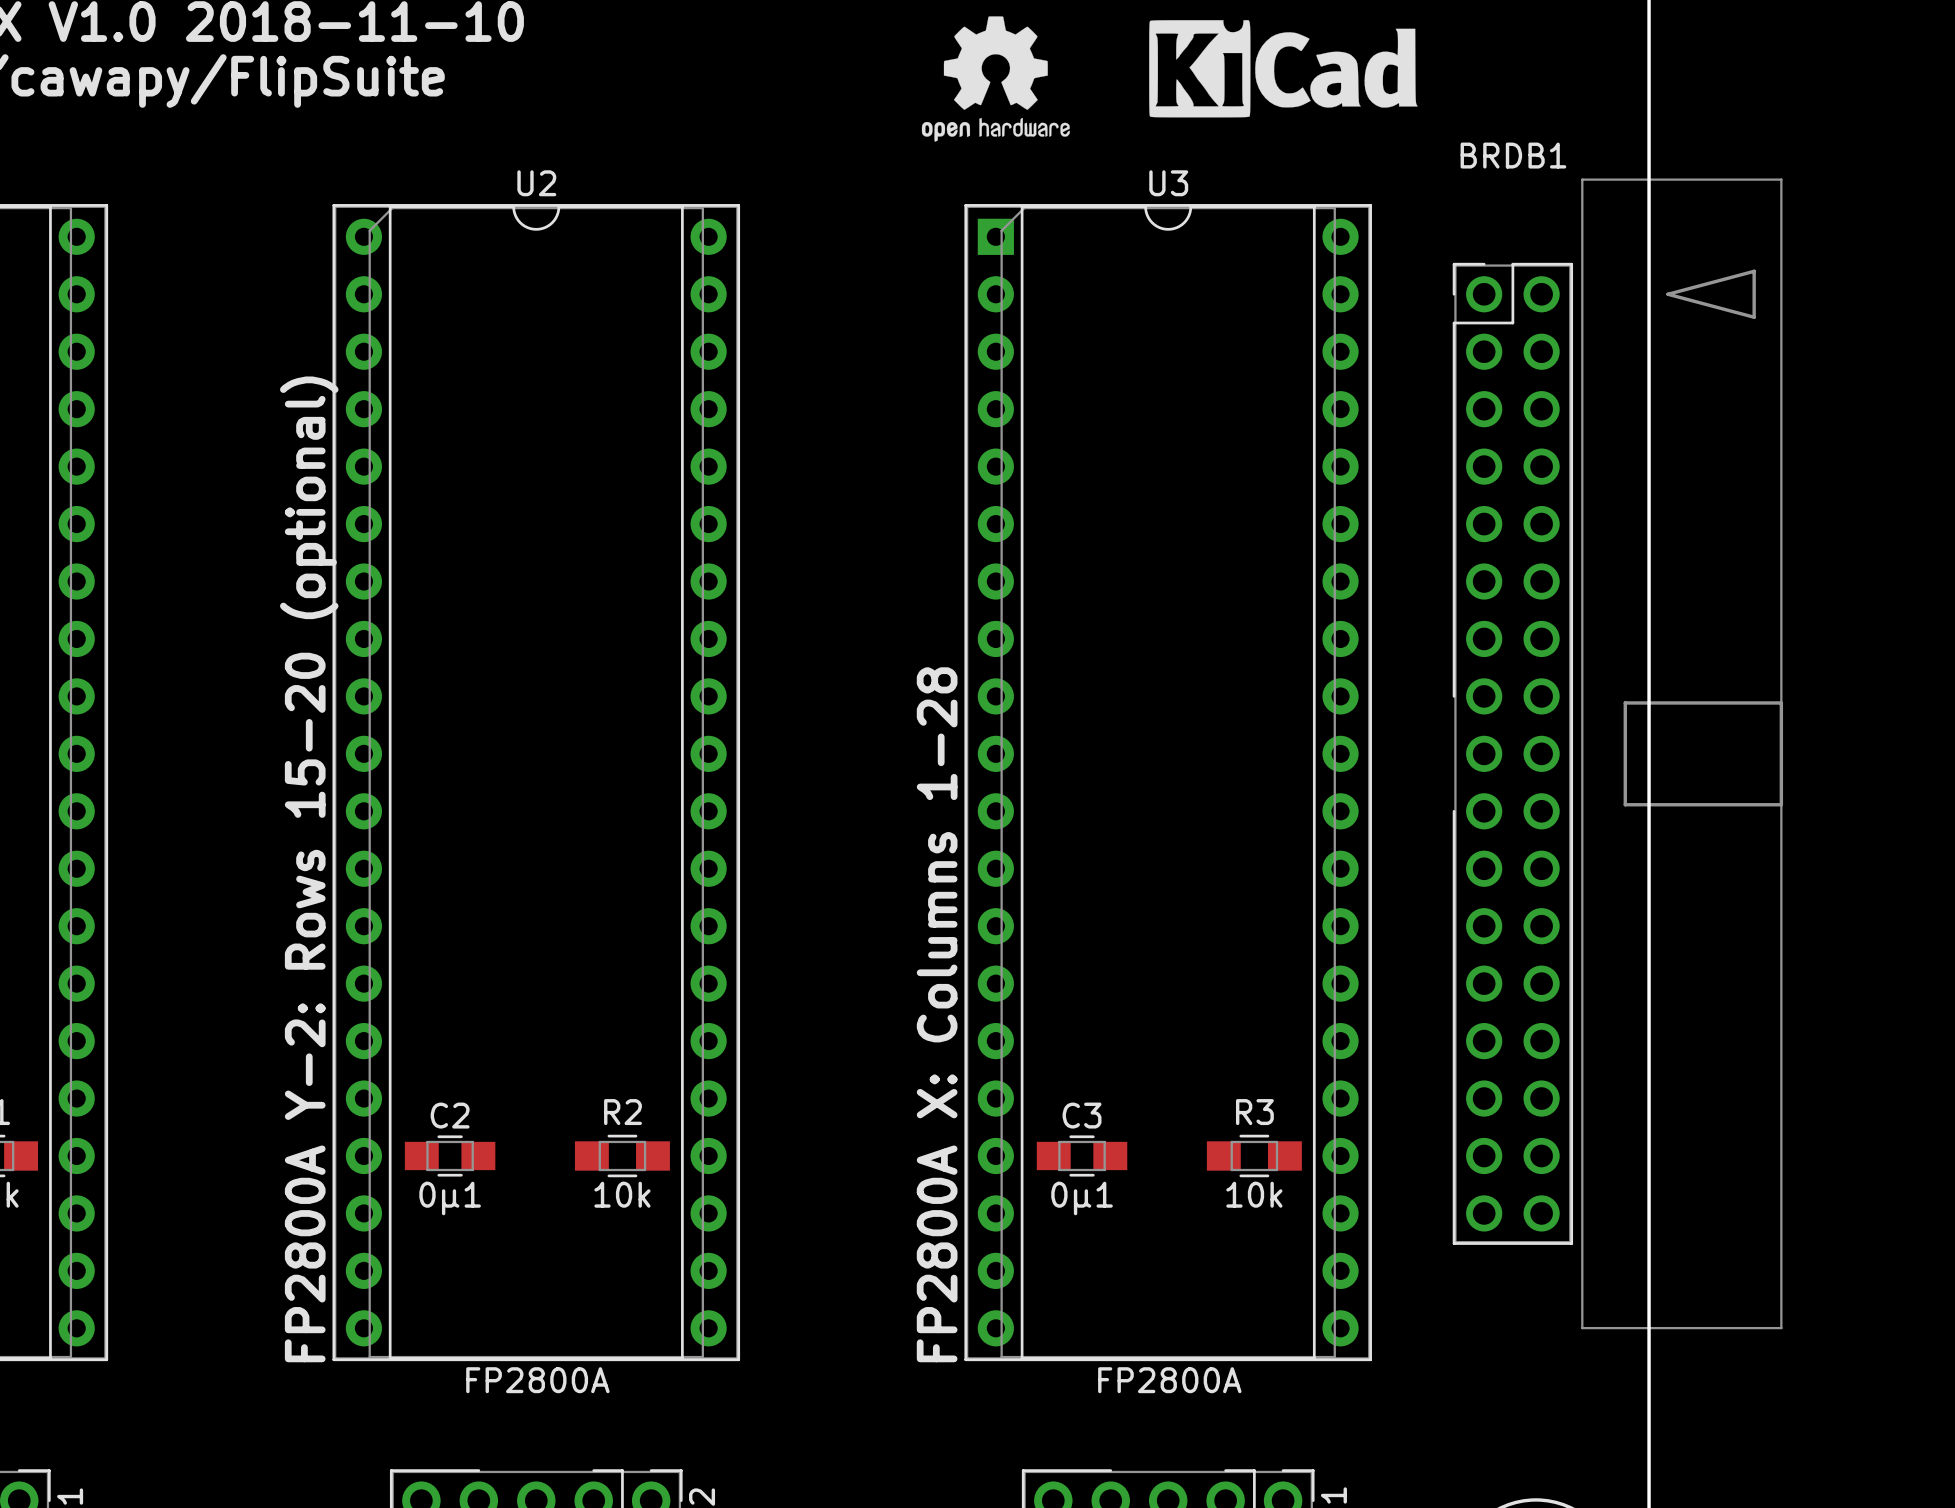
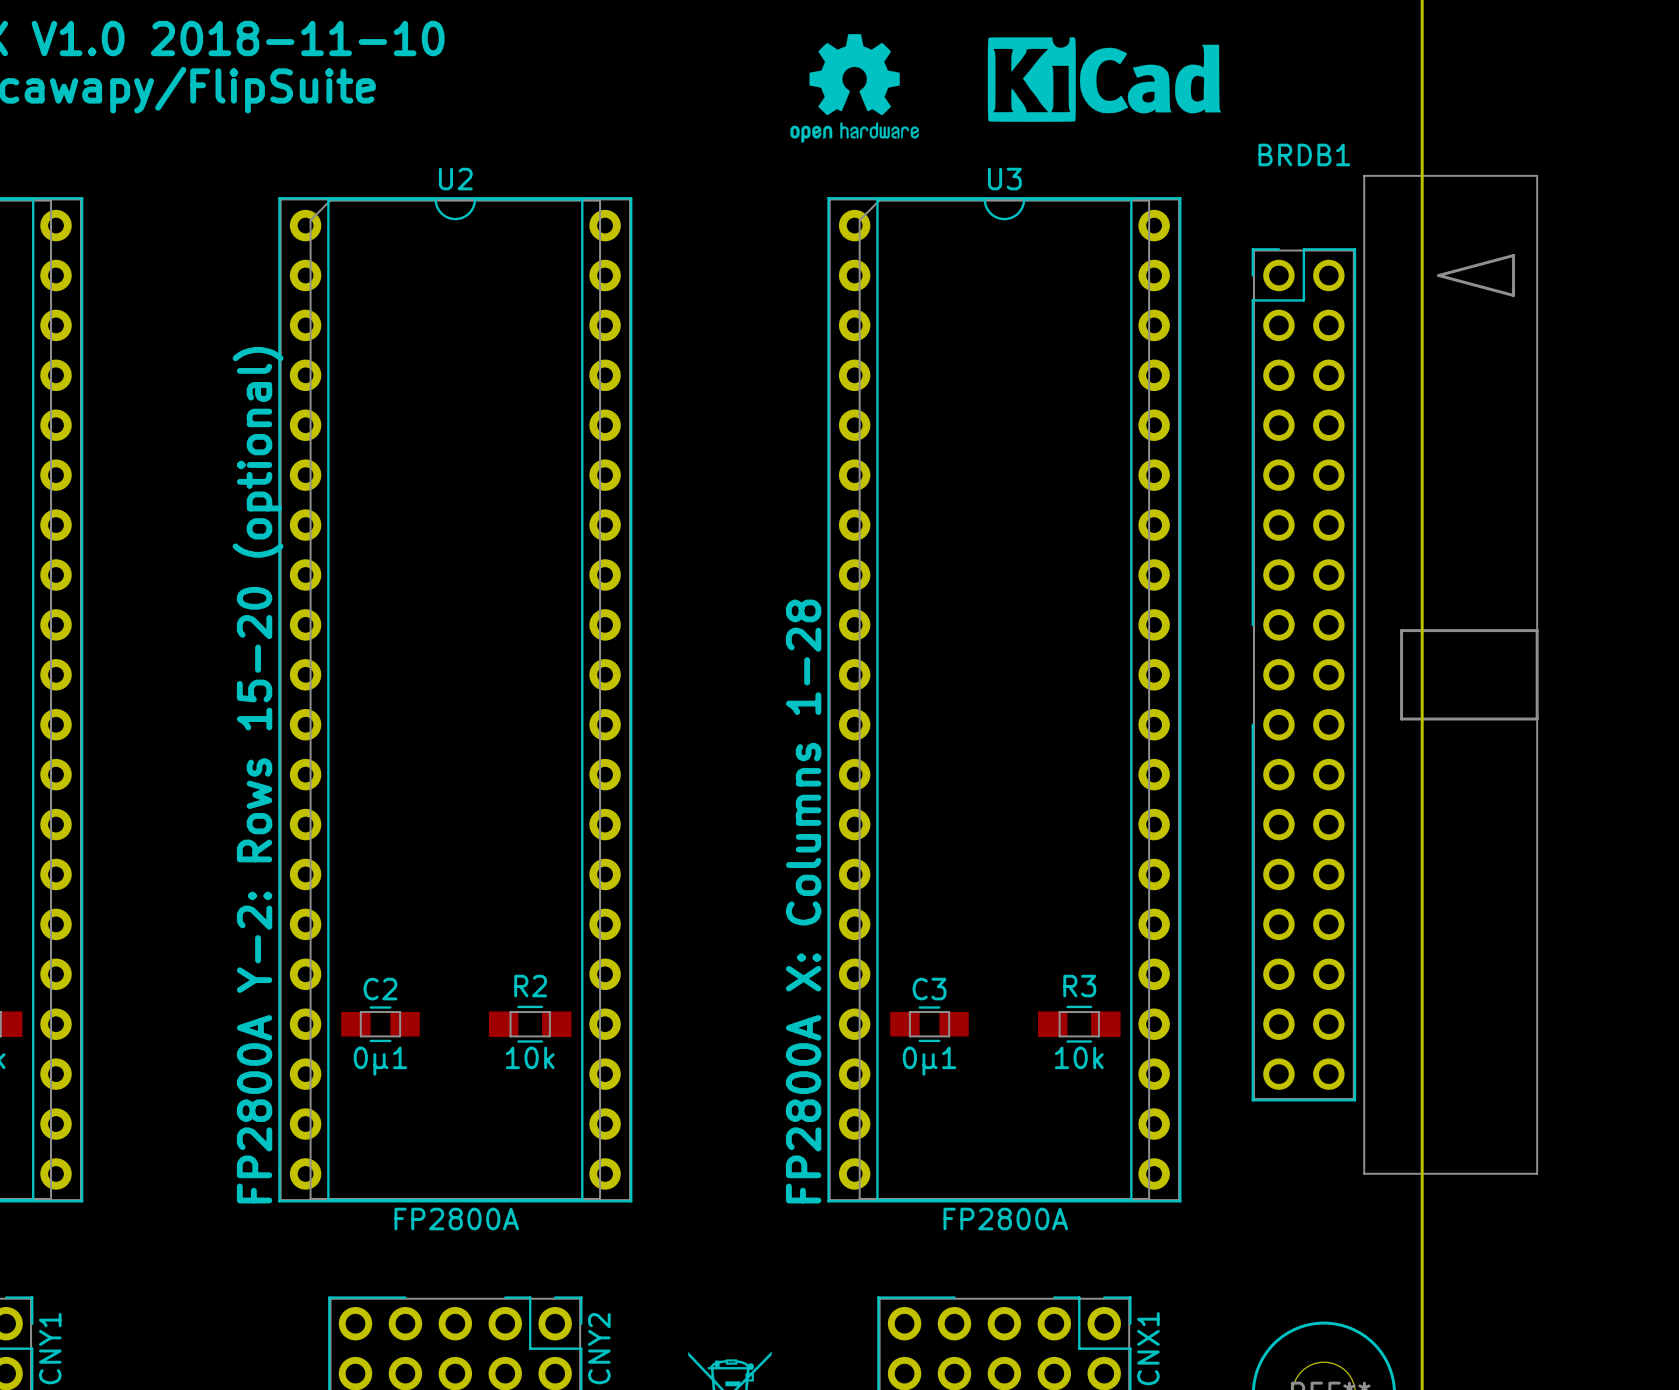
U3 footprint: [964, 204, 1372, 1362] -> [827, 197, 1182, 1203]

